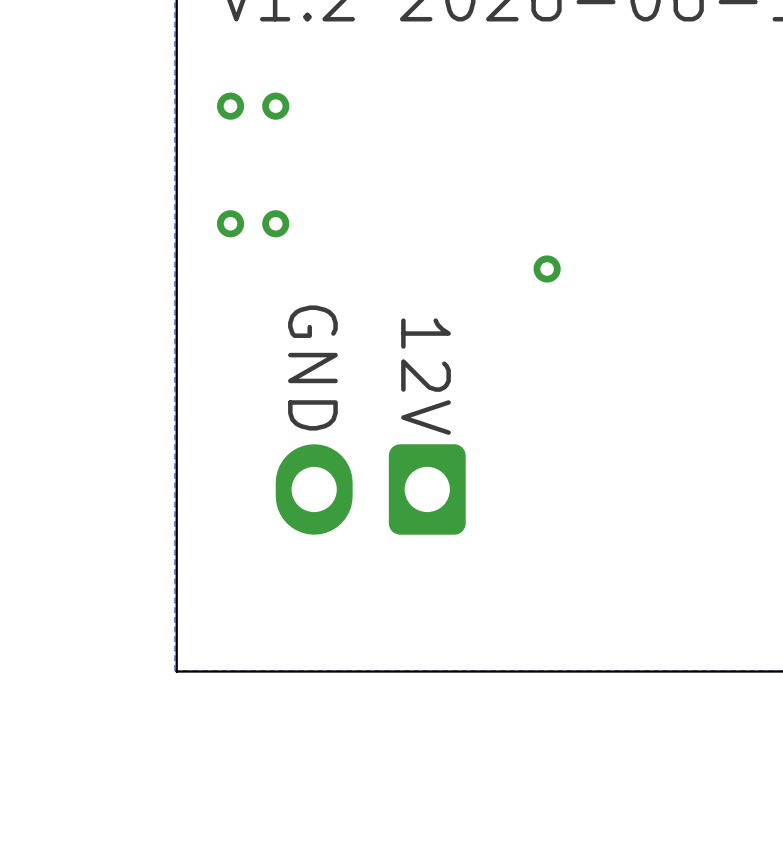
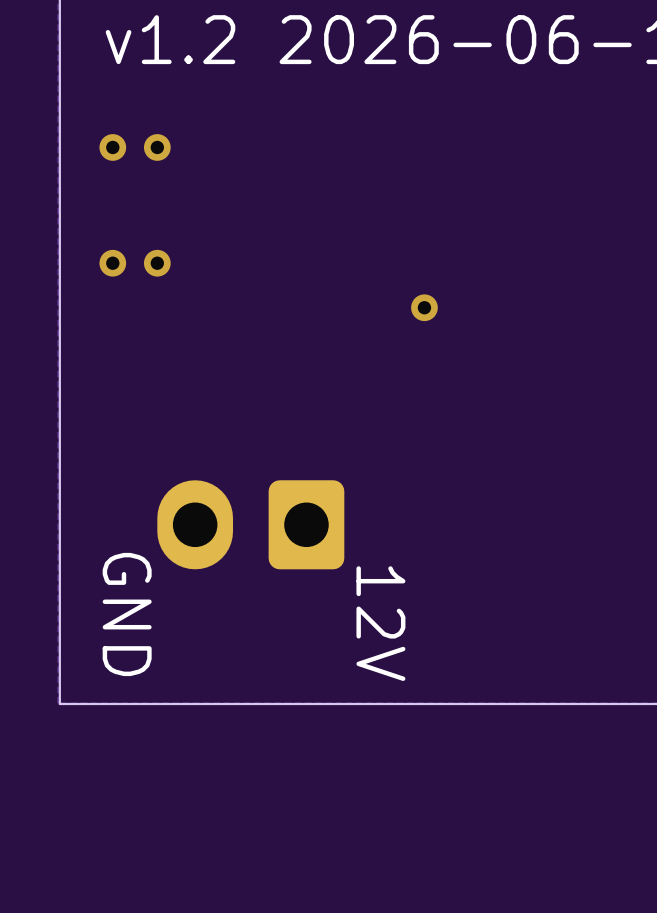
text position: GND (312, 368) -> GND (127, 614)
text position: 12V (426, 376) -> 12V (380, 623)

